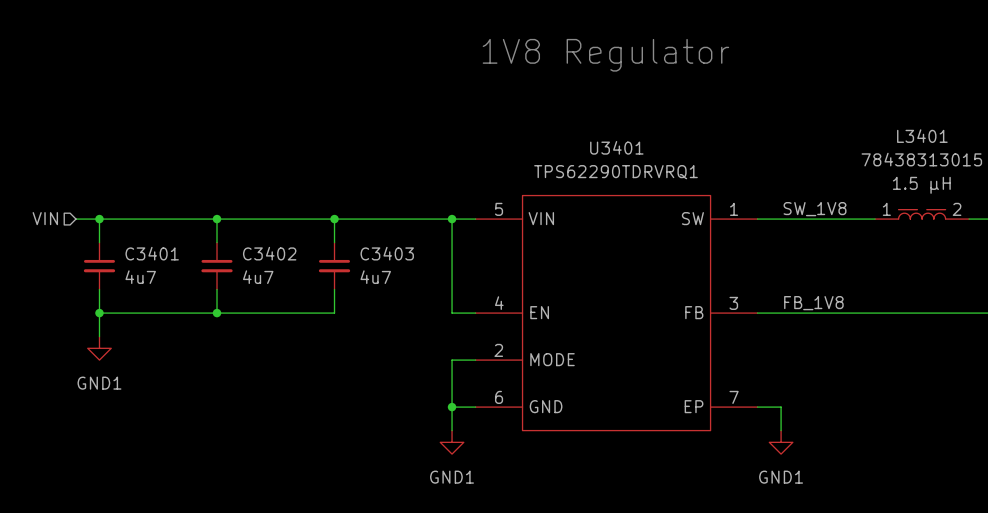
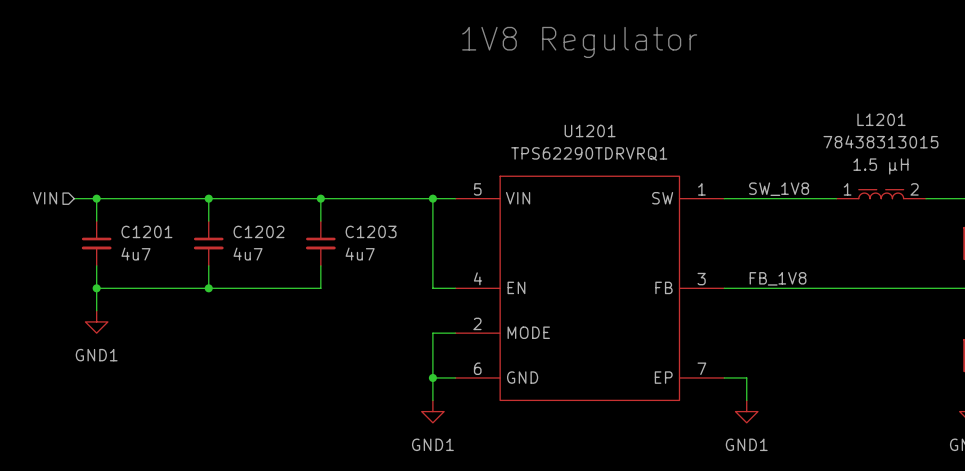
L3401 name: L3401 (922, 136) -> L1201 (881, 119)
U3401 name: U3401 (616, 147) -> U1201 (590, 130)
C3401 name: C3401 (152, 253) -> C1201 (146, 231)
C3402 name: C3402 (269, 253) -> C1202 (259, 231)
C3403 name: C3403 (387, 253) -> C1203 (371, 231)

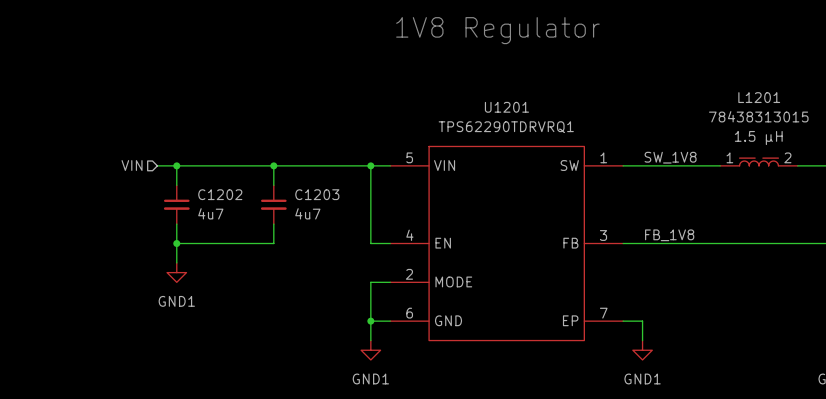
hierarchical label position: VIN (44, 198) -> VIN (132, 165)
wire: (74, 198) (186, 198) -> none
wire: (96, 198) (96, 221) -> none
junction: (96, 198) -> none
C1201: 4u7 (96, 243) -> none
wire: (96, 265) (96, 310) -> none
wire: (96, 288) (208, 288) -> (176, 262) (176, 243)
junction: (96, 288) -> none
power symbol position: GND1 (96, 321) -> GND1 (176, 272)

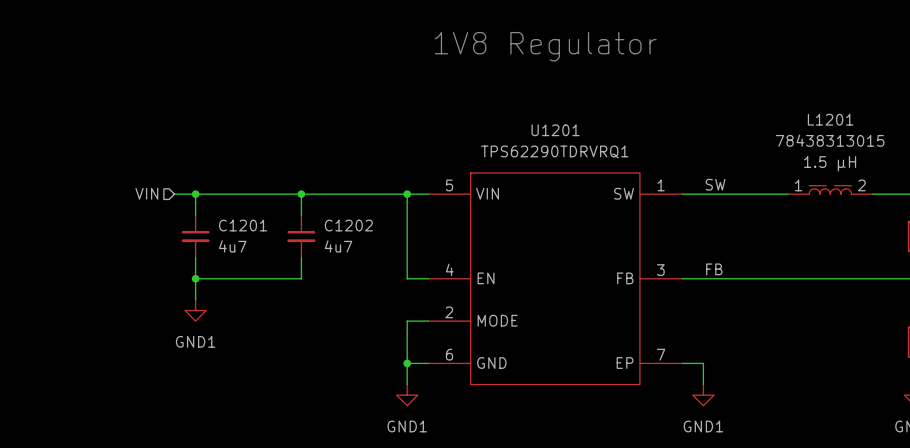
label: SW_1V8 (670, 157) -> SW (715, 184)
C1202 name: C1202 (220, 194) -> C1201 (243, 225)
C1203 name: C1203 (317, 194) -> C1202 (348, 225)
label: FB_1V8 (669, 235) -> FB (714, 269)

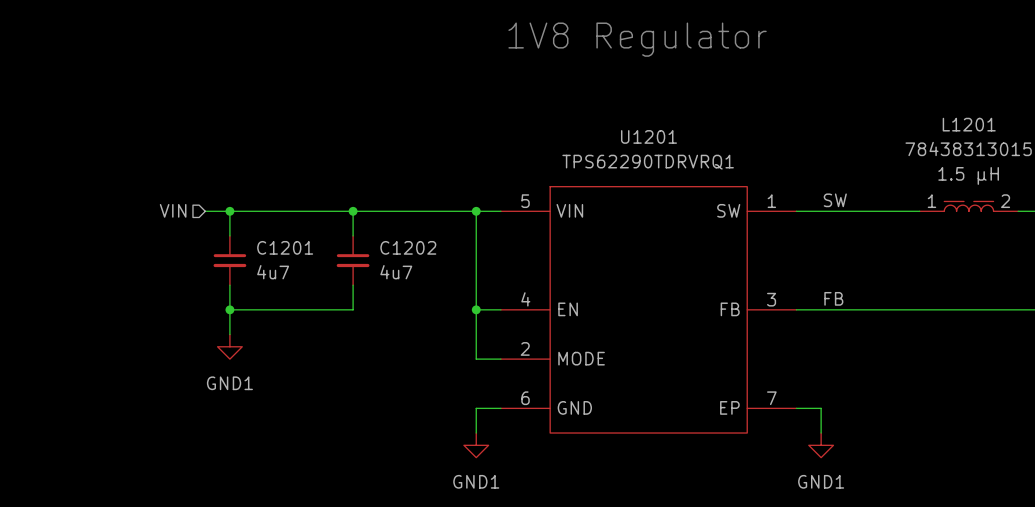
junction: none -> (476, 309)
wire: (407, 321) (407, 363) -> (476, 359) (476, 309)
junction: (407, 363) -> none

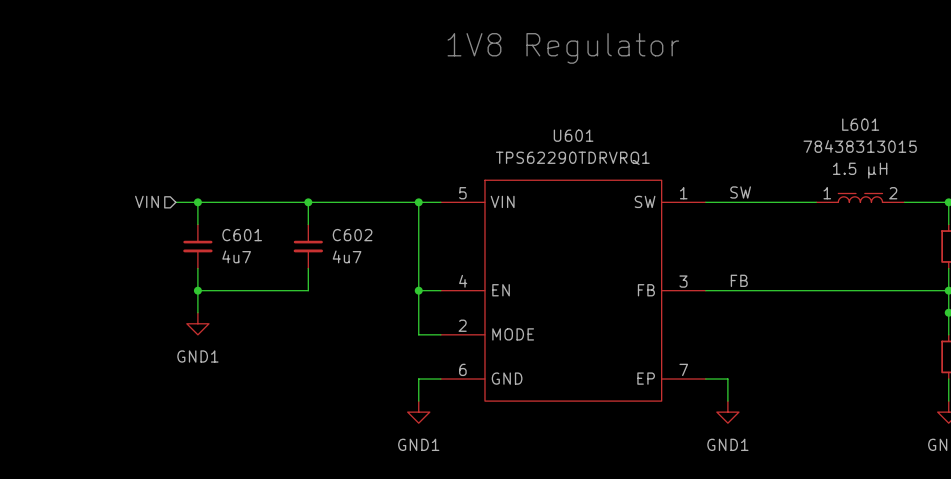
L1201 name: L1201 (969, 124) -> L601 (860, 124)
U1201 name: U1201 (648, 136) -> U601 (573, 135)
C1201 name: C1201 (285, 247) -> C601 (242, 235)
C1202 name: C1202 (408, 247) -> C602 (352, 235)

